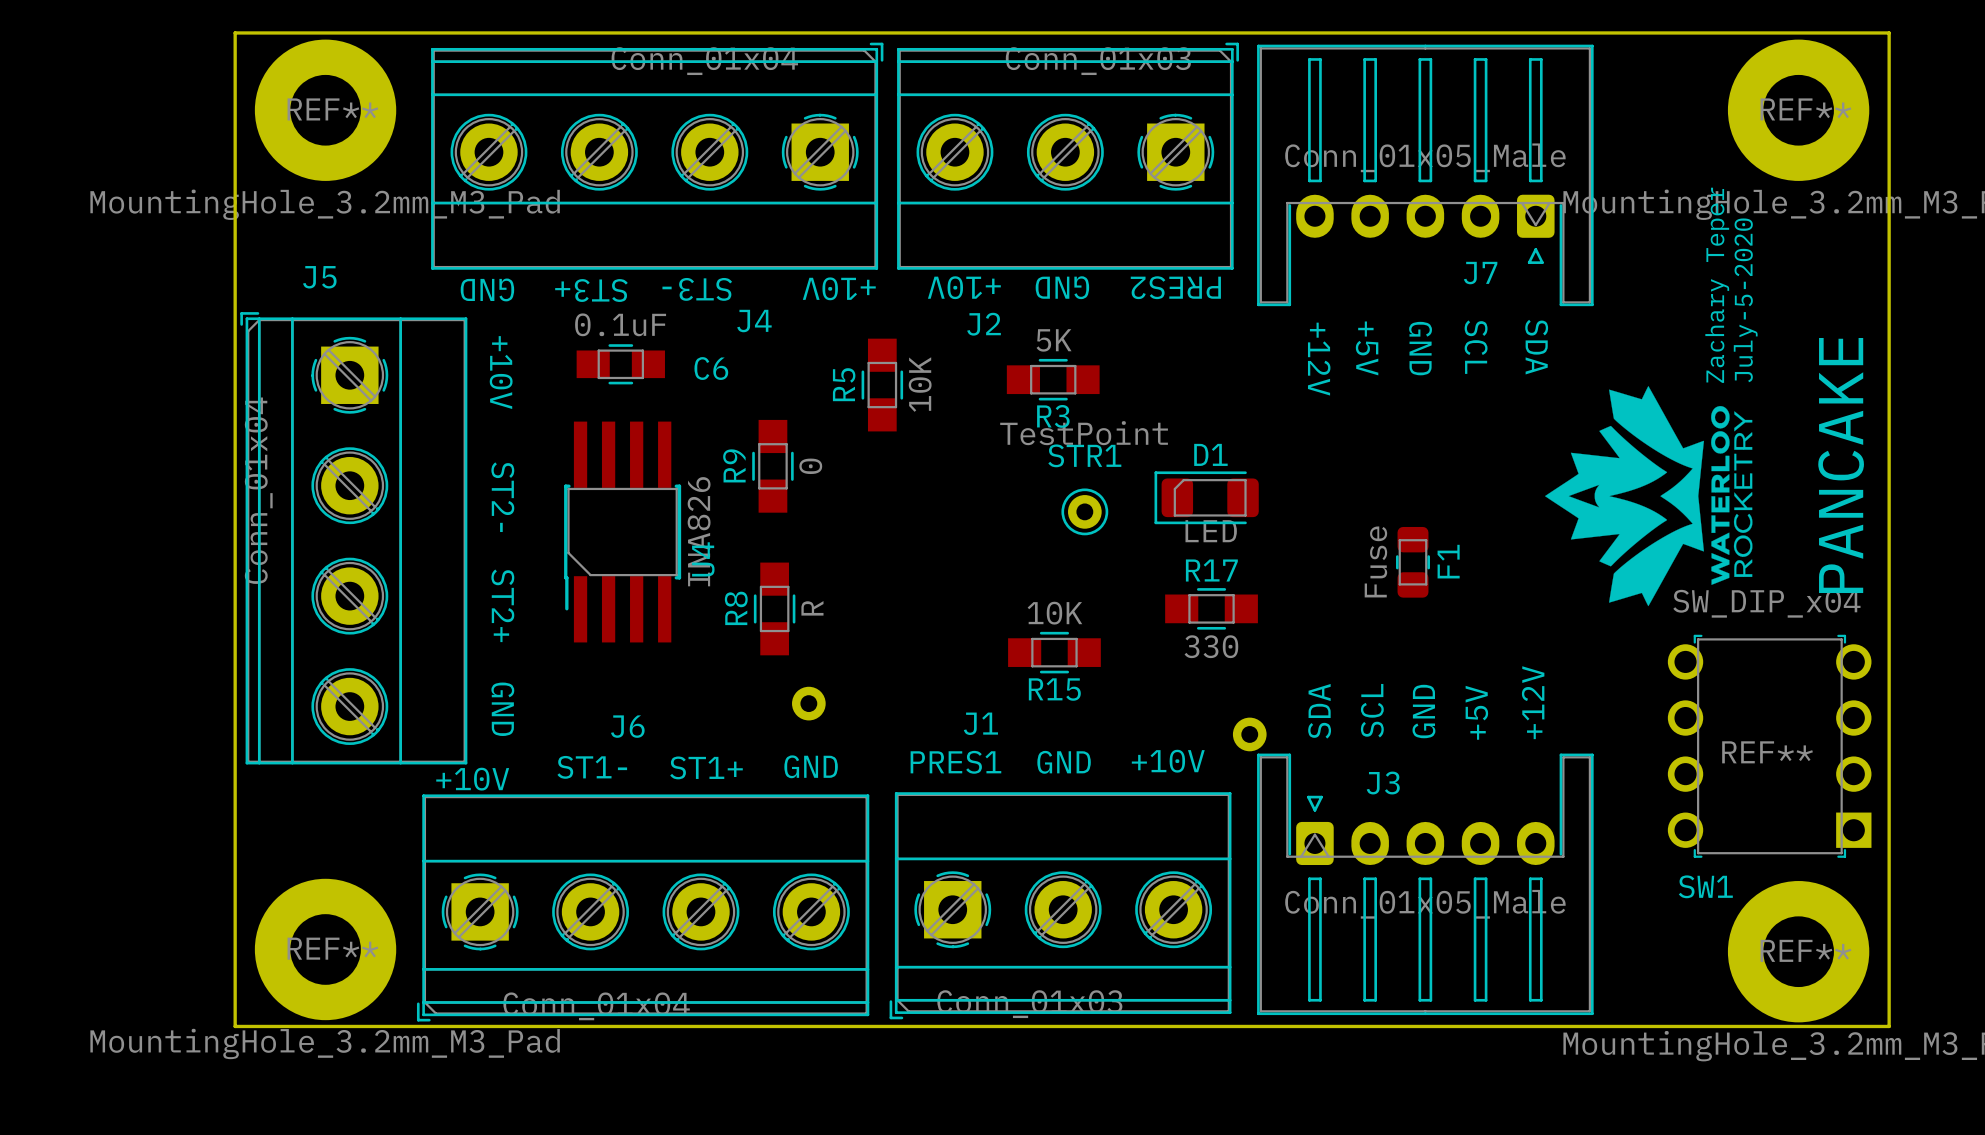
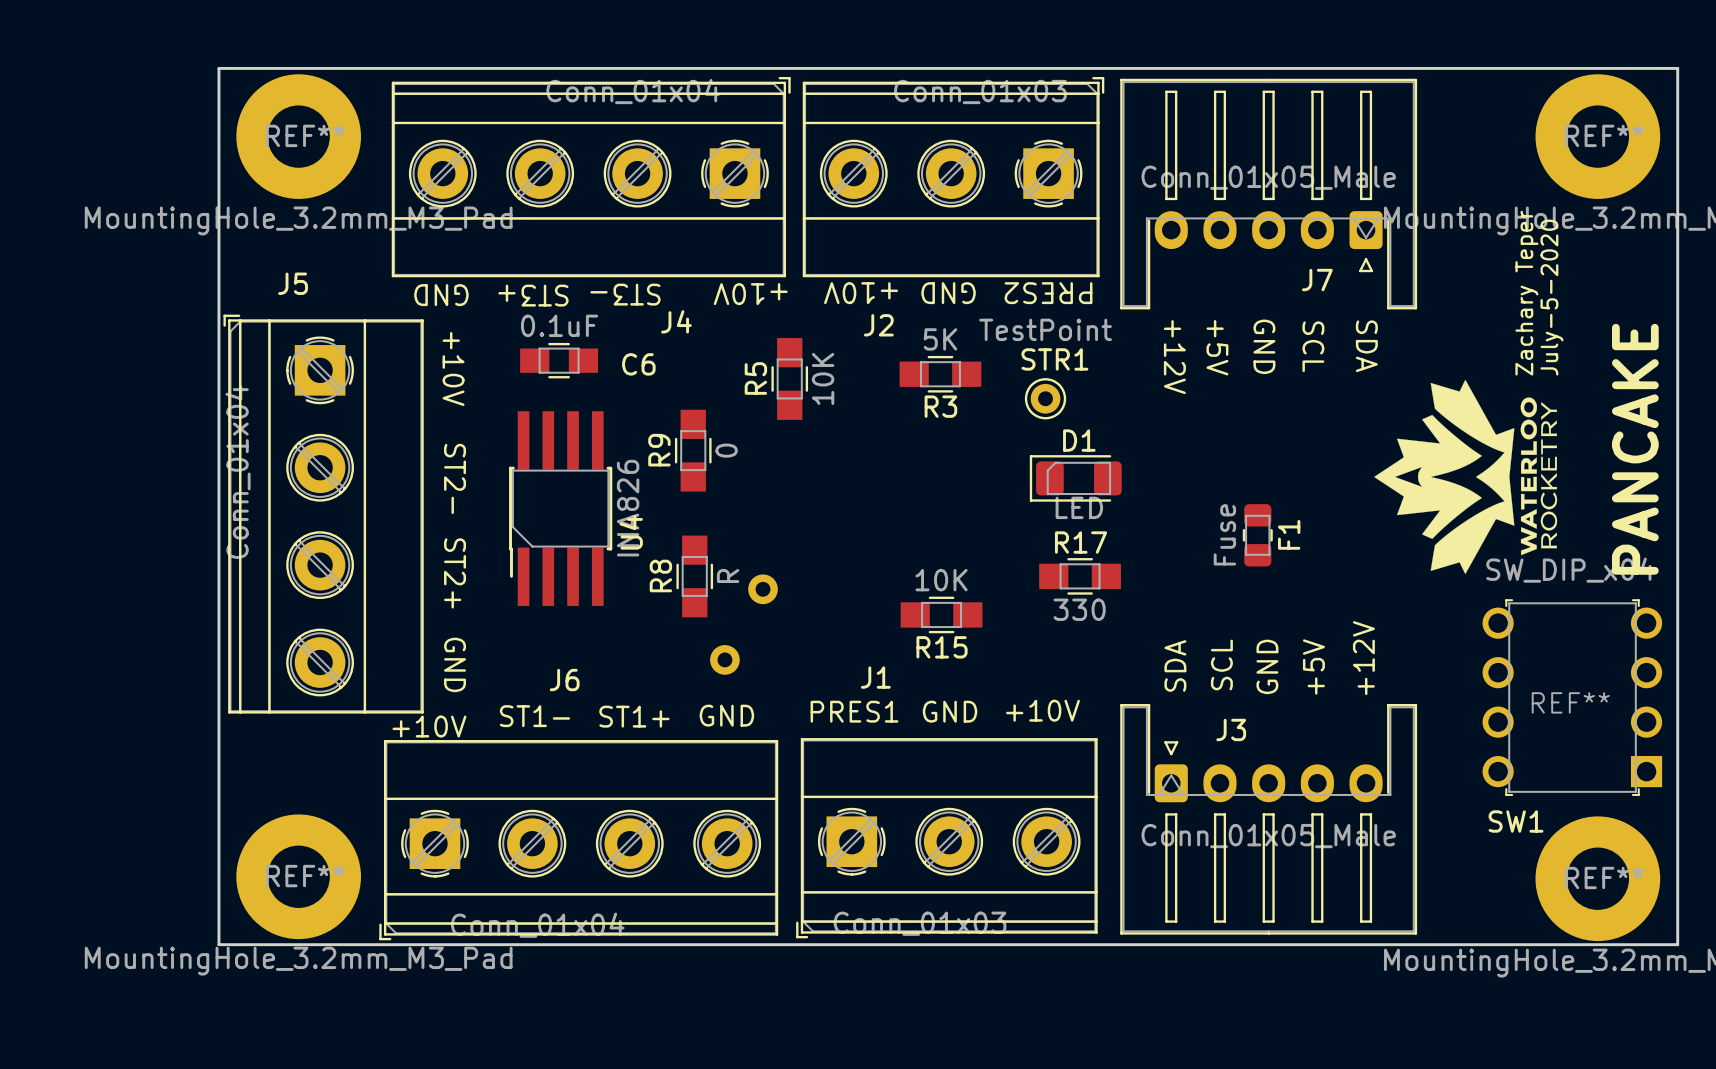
STR1 name position: STR1 (1084, 455) -> STR1 (1054, 359)
STR1 position: (1084, 511) -> (1045, 398)
part position: (1249, 734) -> (763, 589)

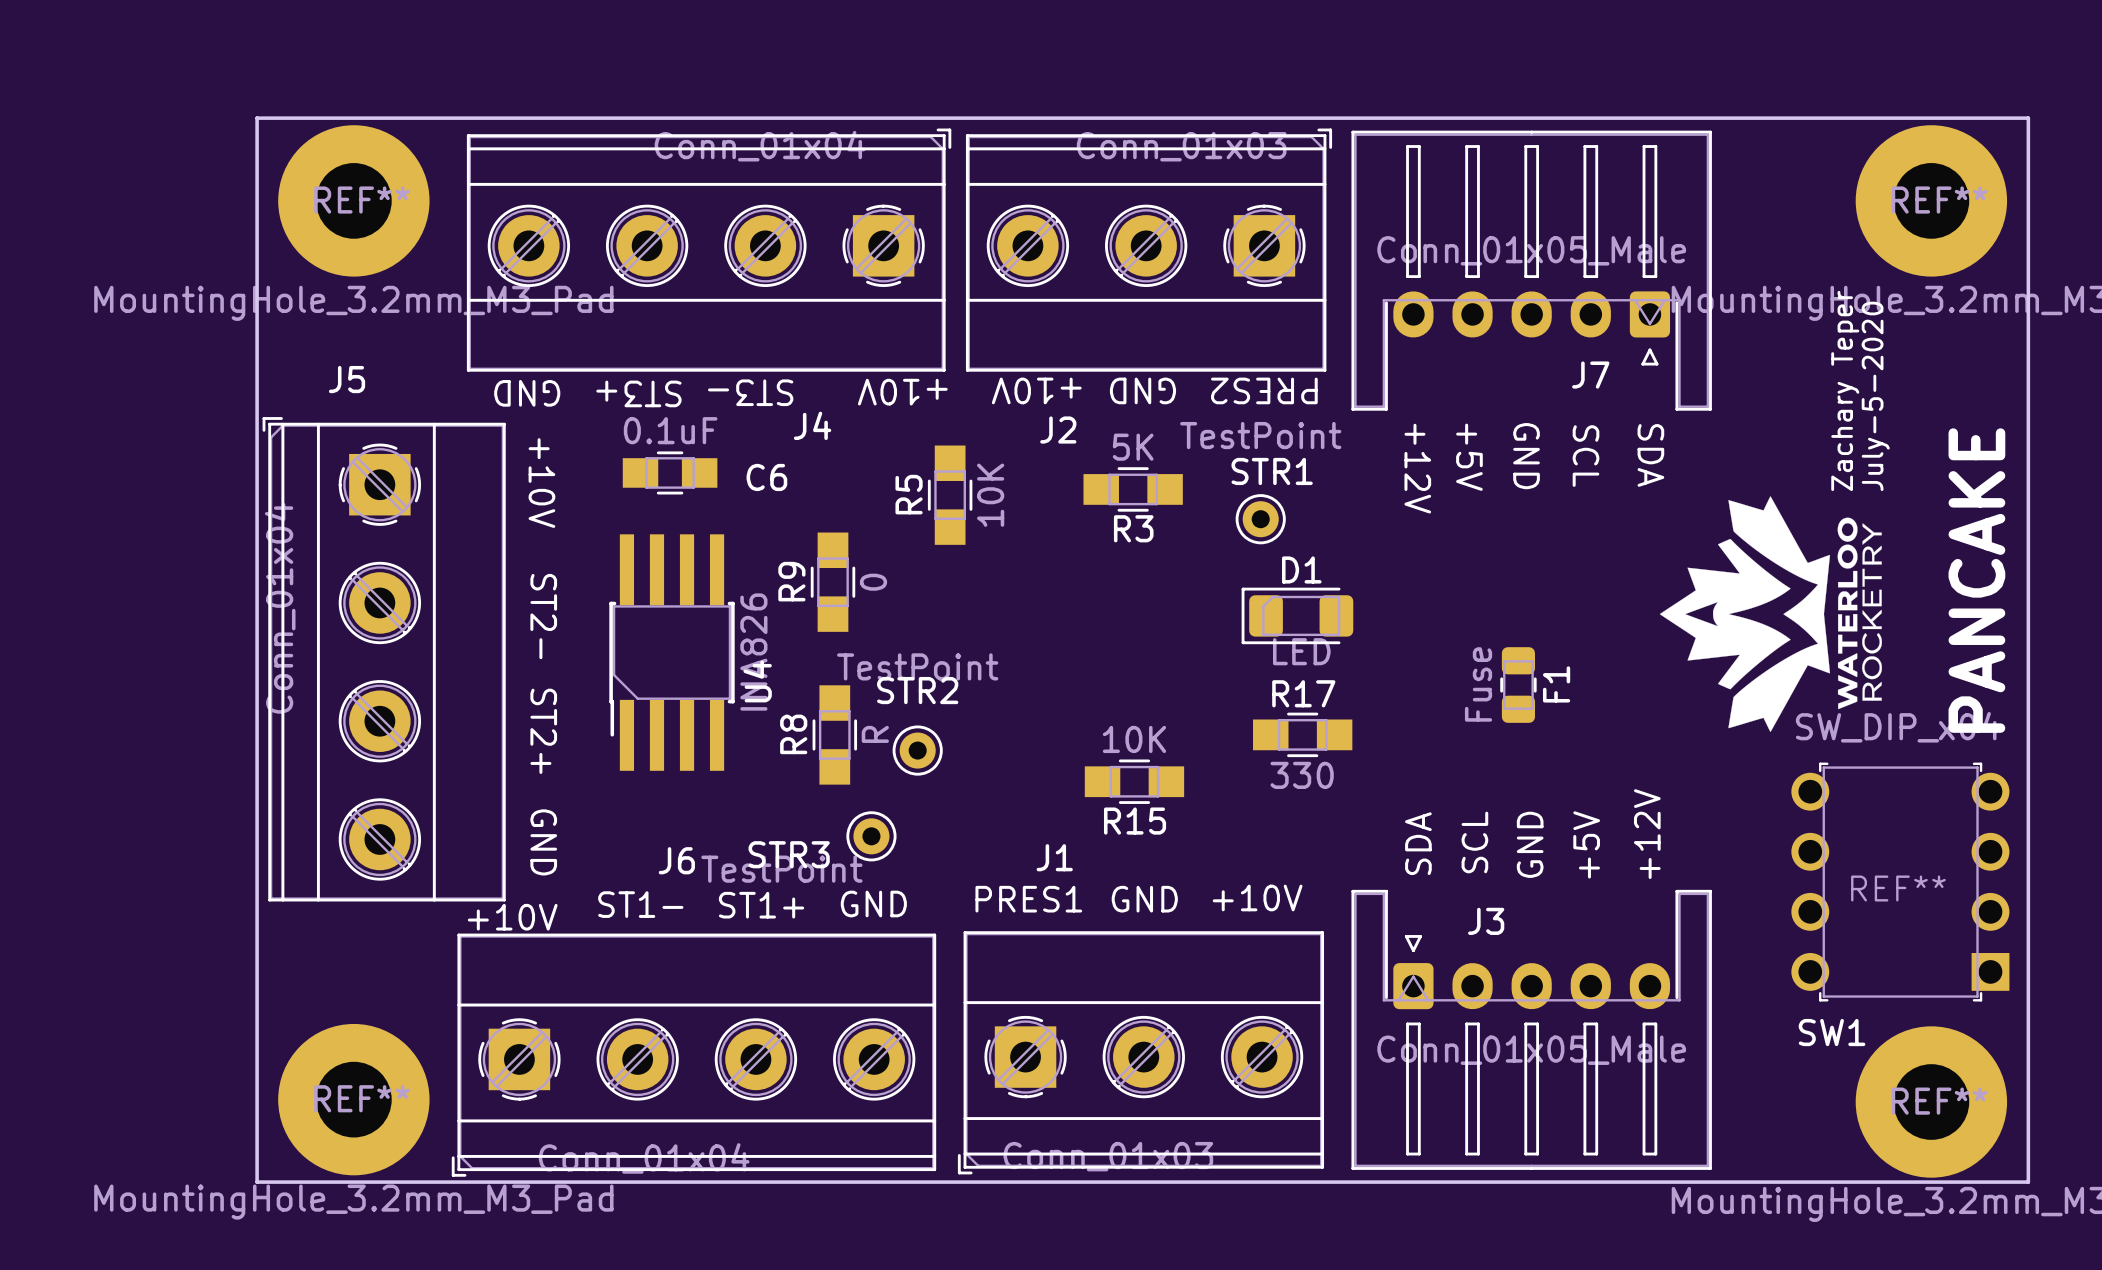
STR2 side: bottom (763, 589) -> top (917, 750)
STR3 side: bottom (724, 659) -> top (871, 836)

